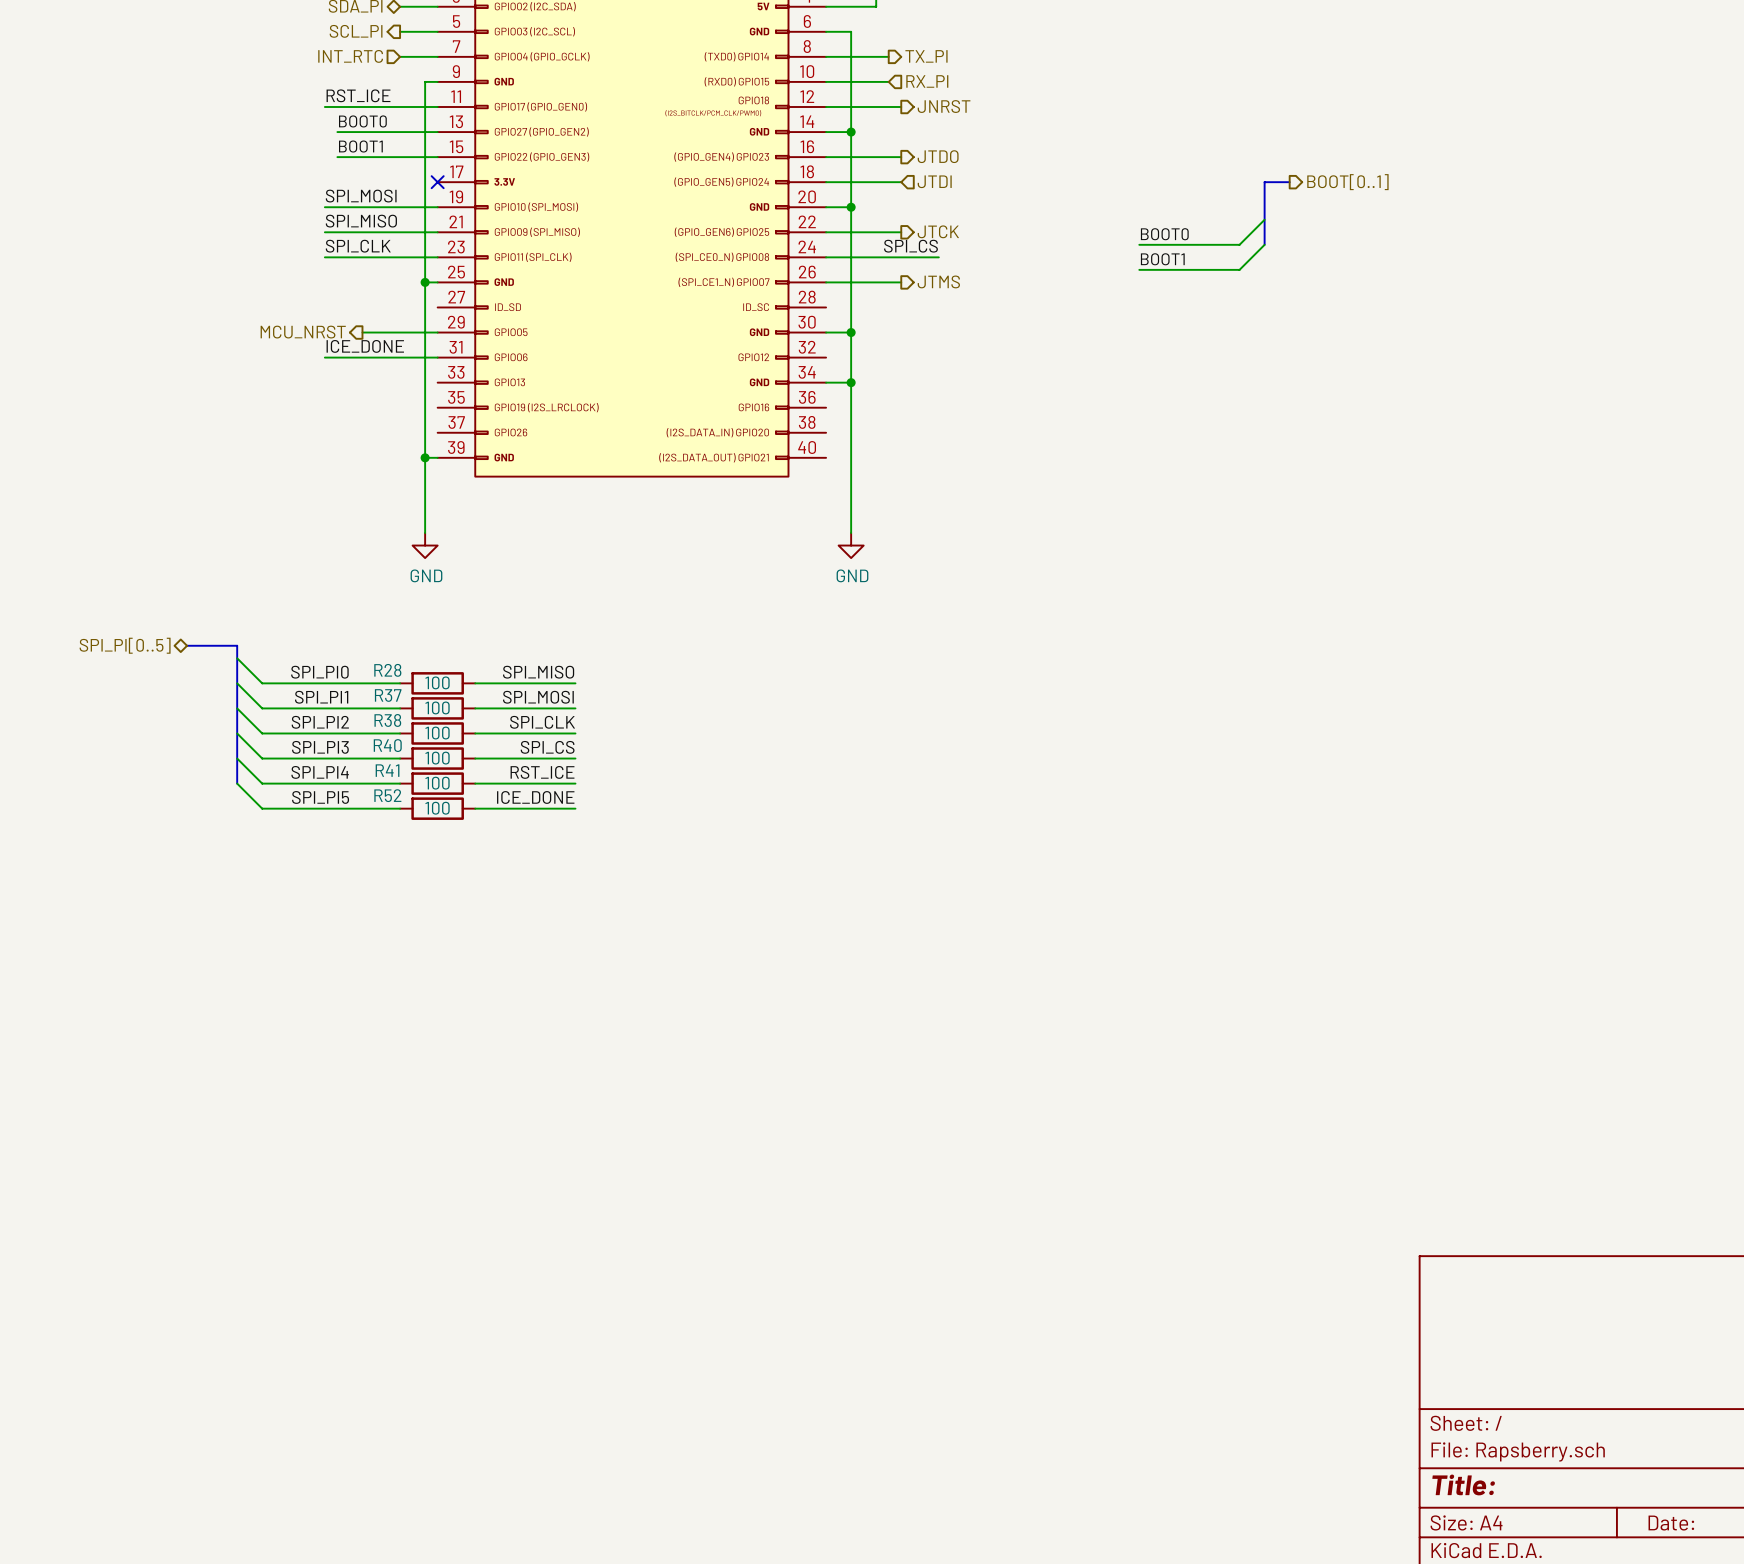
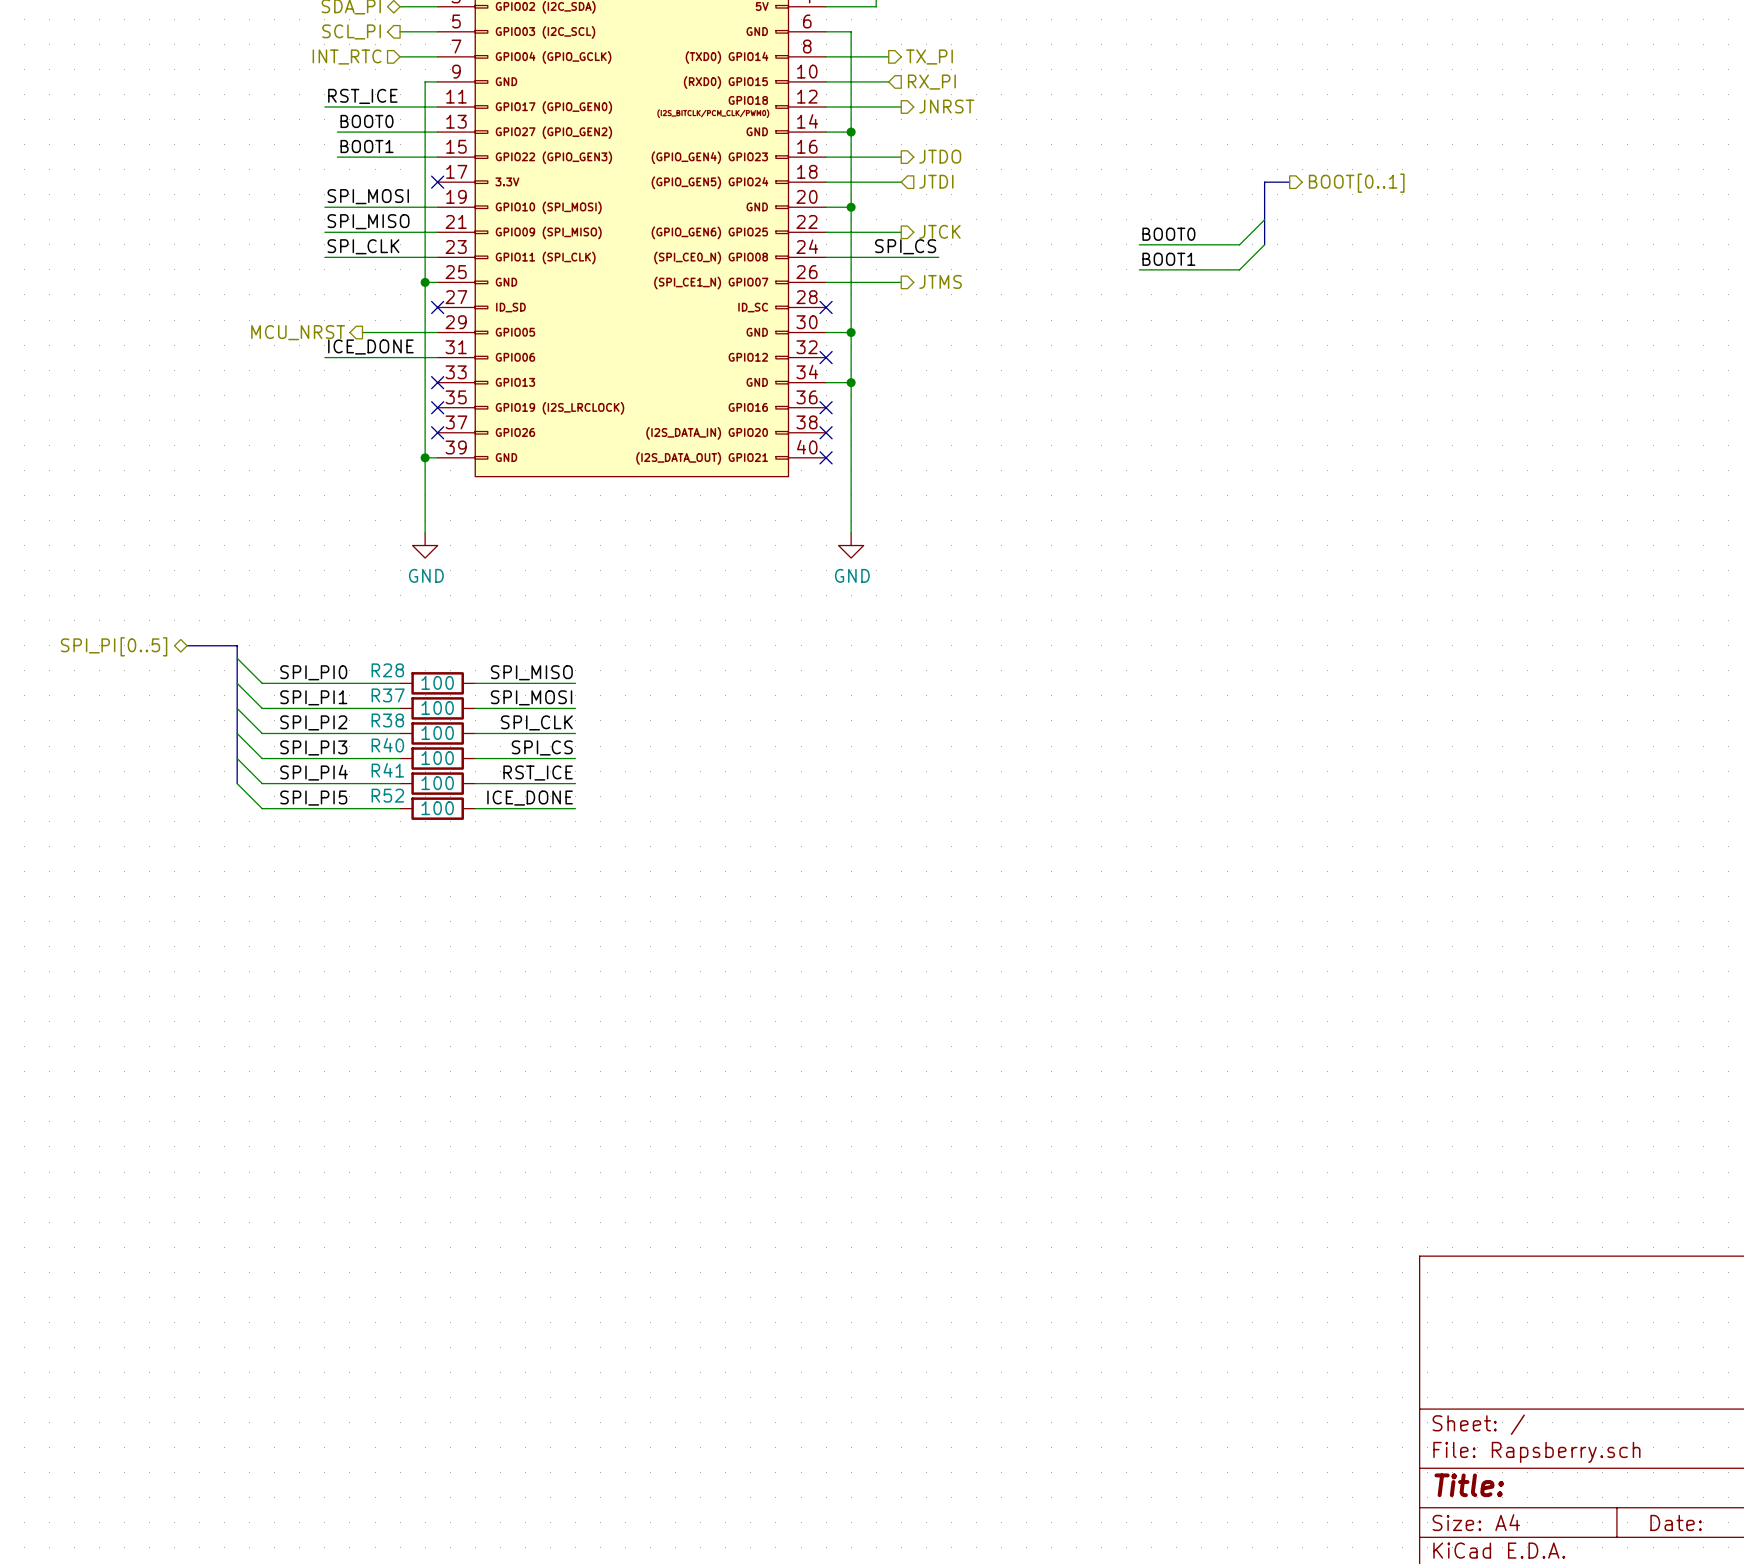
no-connect mark: none -> (437, 307)
no-connect mark: none -> (826, 307)
no-connect mark: none -> (826, 357)
no-connect mark: none -> (437, 382)
no-connect mark: none -> (437, 407)
no-connect mark: none -> (826, 407)
no-connect mark: none -> (437, 432)
no-connect mark: none -> (826, 432)
no-connect mark: none -> (826, 457)

